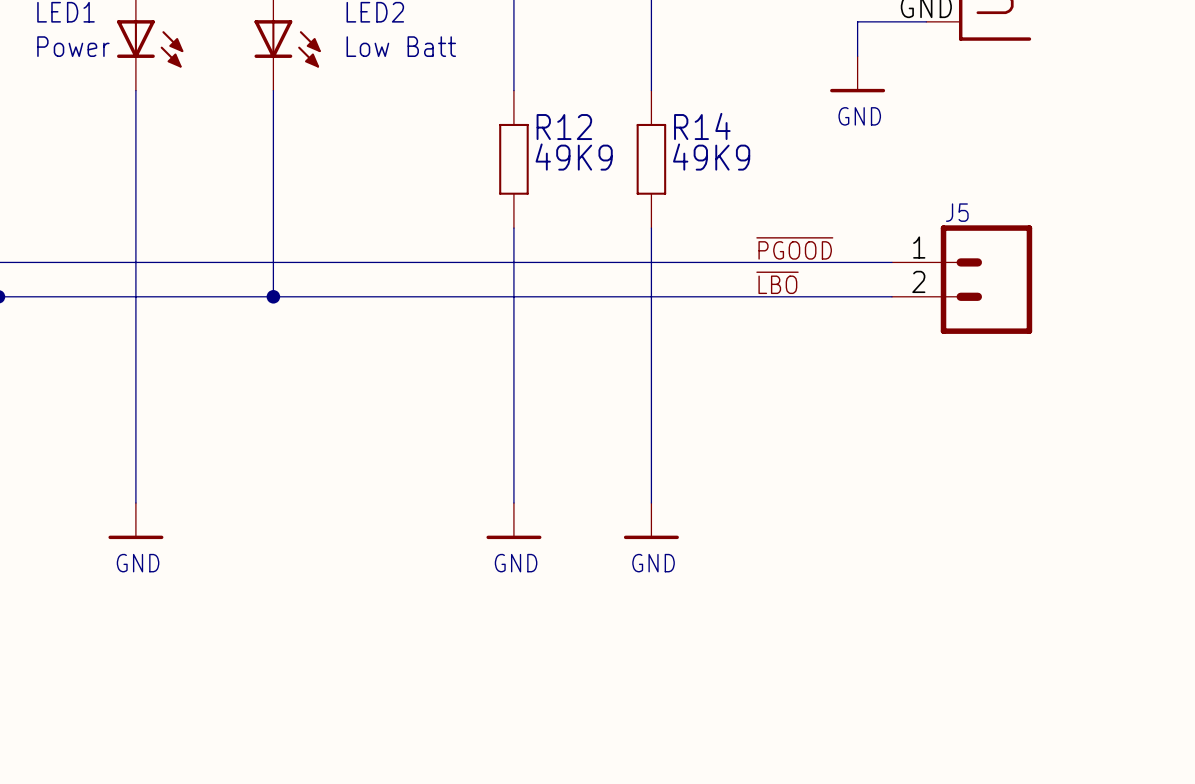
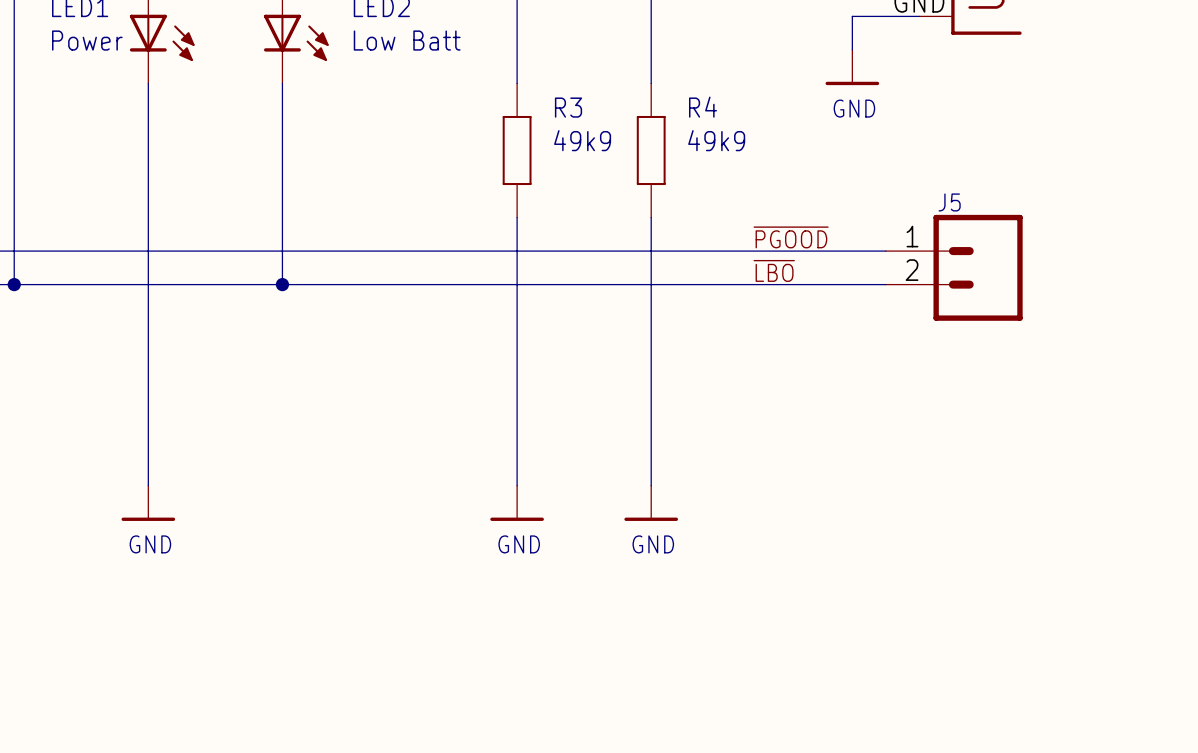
R14 name: R14 (702, 126) -> R4 (703, 107)
R12 name: R12 (564, 127) -> R3 (568, 107)
R12 value: 49K9 (574, 157) -> 49k9 (582, 140)
R14 value: 49K9 (711, 157) -> 49k9 (716, 140)

